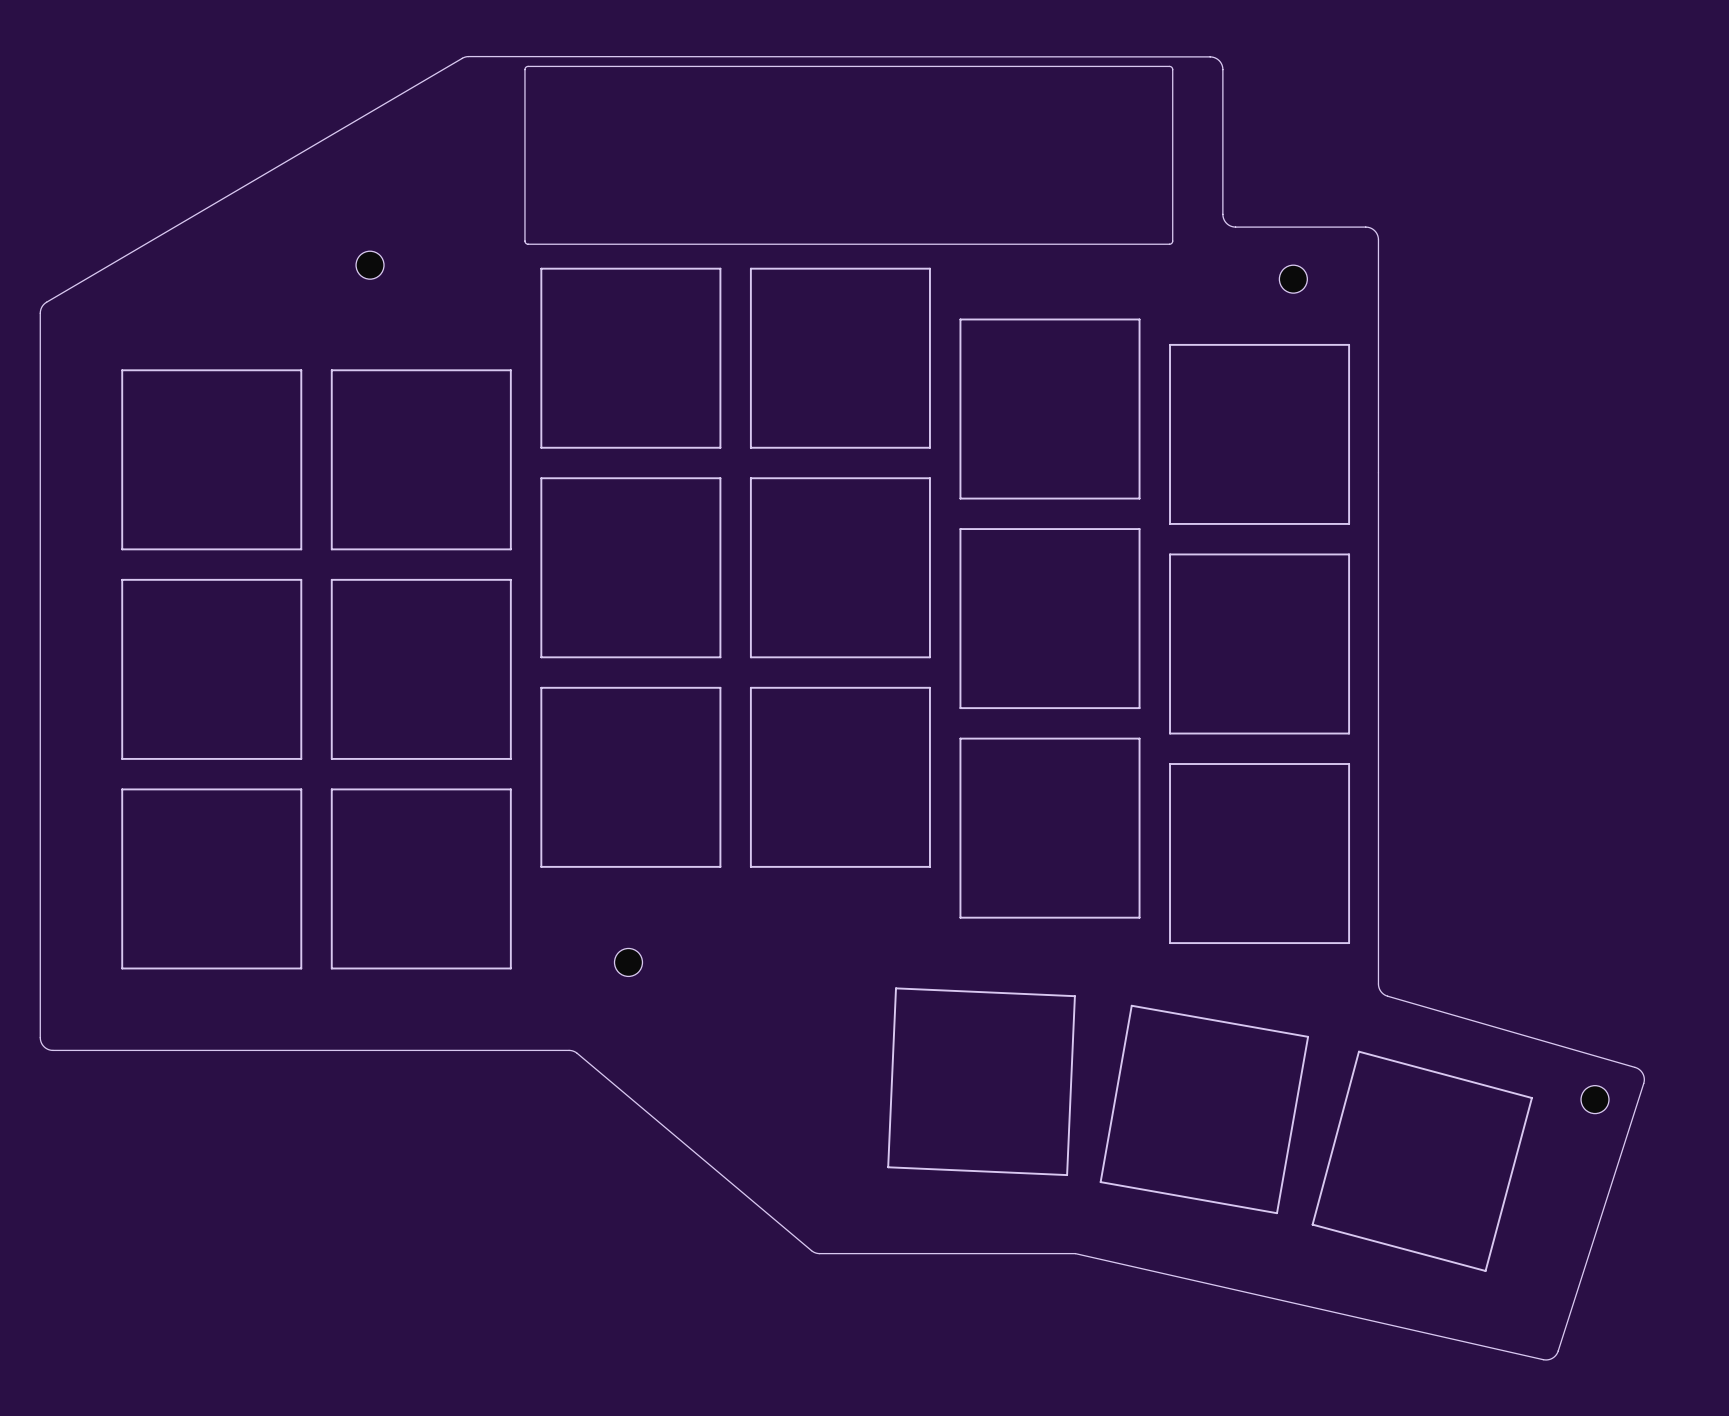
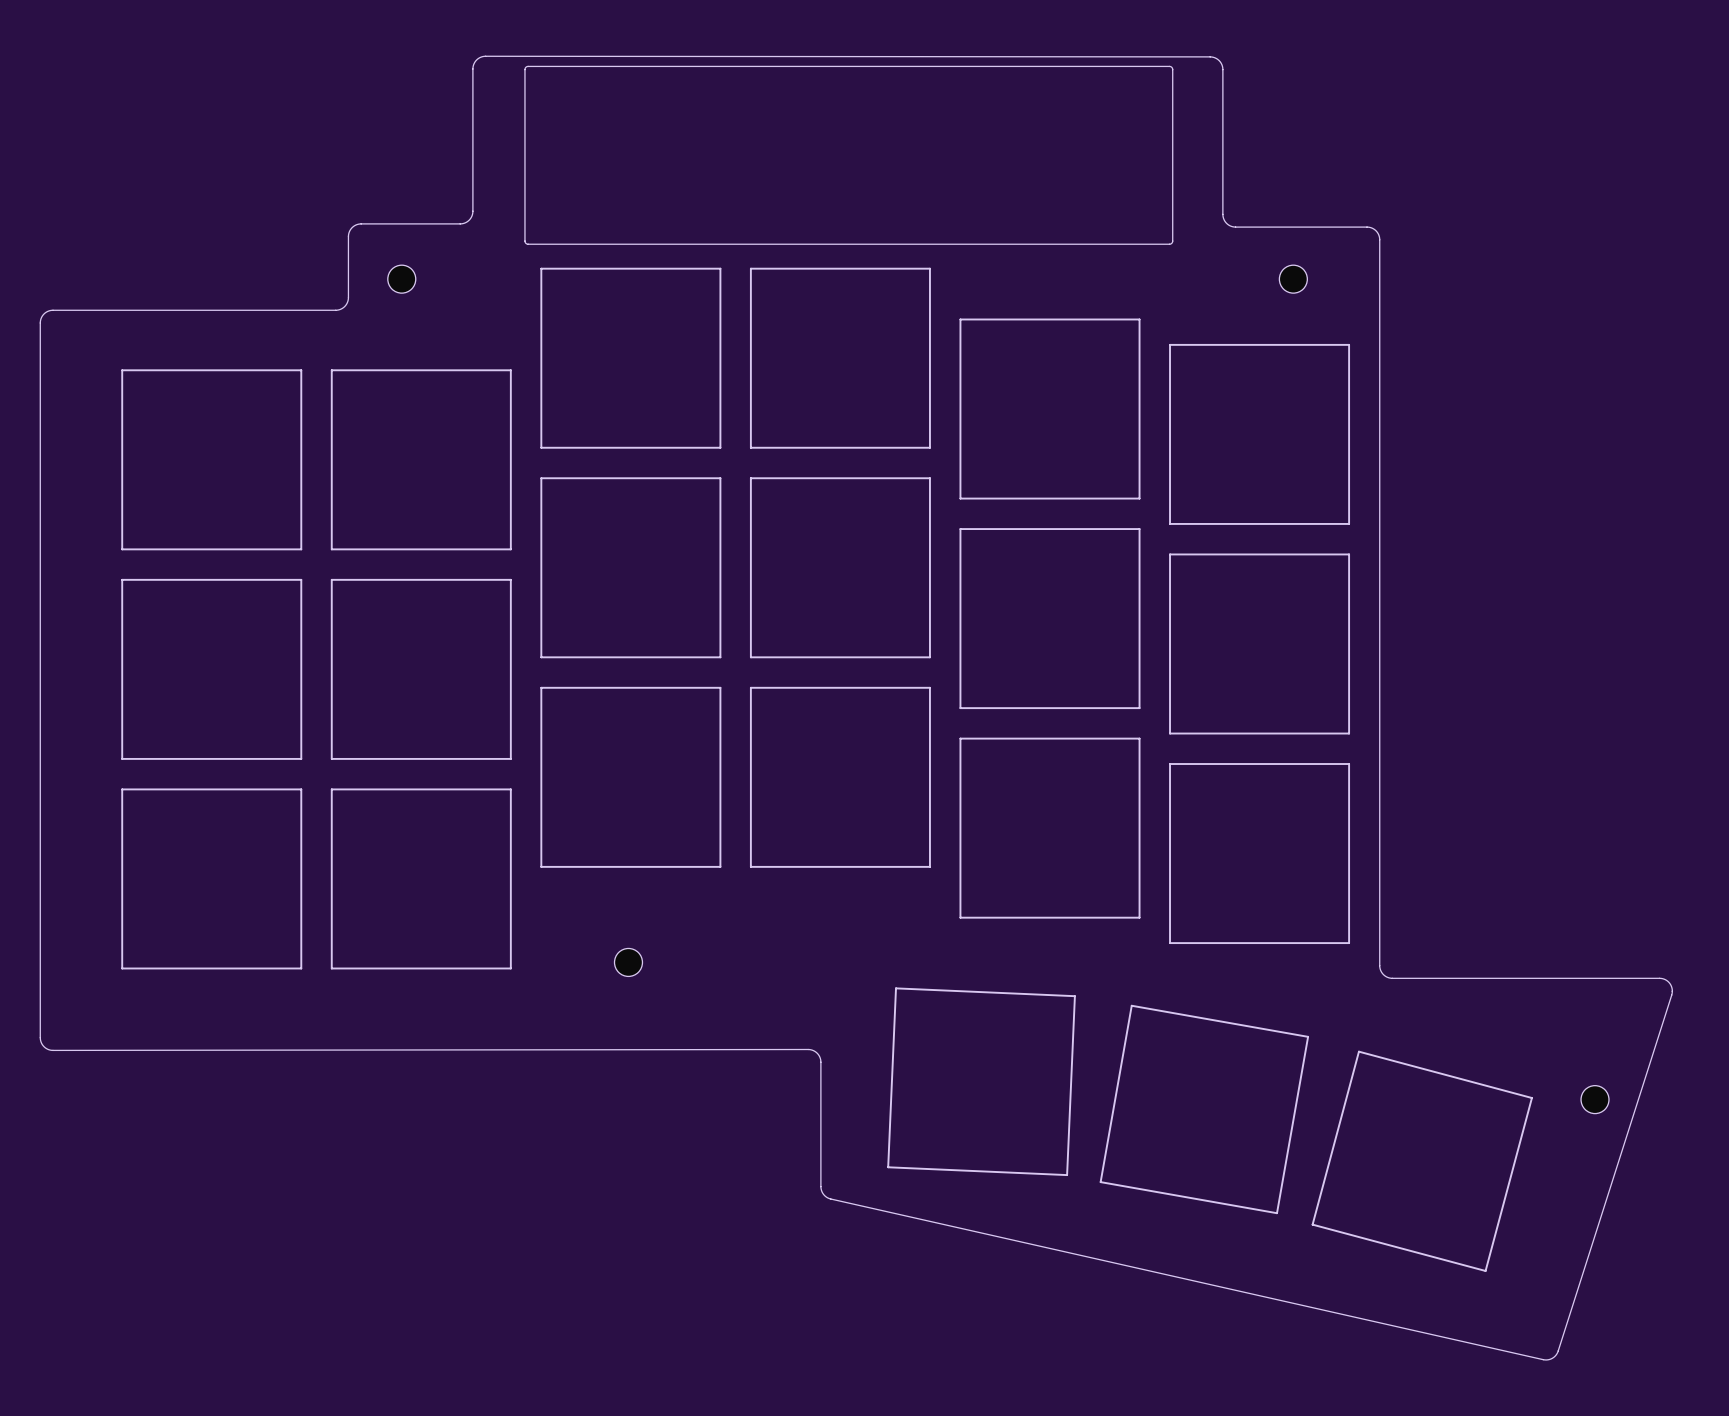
board edge: (468, 56) (1210, 56) -> (40, 322) (44, 313) (52, 310) (335, 310) (342, 308) (348, 298) (348, 235) (354, 225) (361, 223) (461, 223) (470, 217) (472, 211) (472, 67) (476, 59) (482, 56) (1210, 56)
board edge: (468, 56) (462, 58) (46, 302) (40, 309) (40, 322) -> none
board edge: (1365, 227) (1374, 230) (1378, 239) (1378, 987) (1382, 992) (1387, 996) (1635, 1067) (1641, 1071) (1644, 1077) (1558, 1350) -> (1365, 227) (1376, 230) (1379, 239) (1380, 969) (1385, 976) (1392, 978) (1661, 978) (1669, 983) (1672, 991)
part position: (370, 265) -> (401, 279)
board edge: none -> (1672, 991) (1558, 1350)
board edge: (52, 1050) (572, 1050) (815, 1252) (1075, 1253) (1543, 1359) -> (52, 1050) (810, 1049) (818, 1054) (820, 1060) (820, 1186) (822, 1193) (828, 1198) (1543, 1359)

